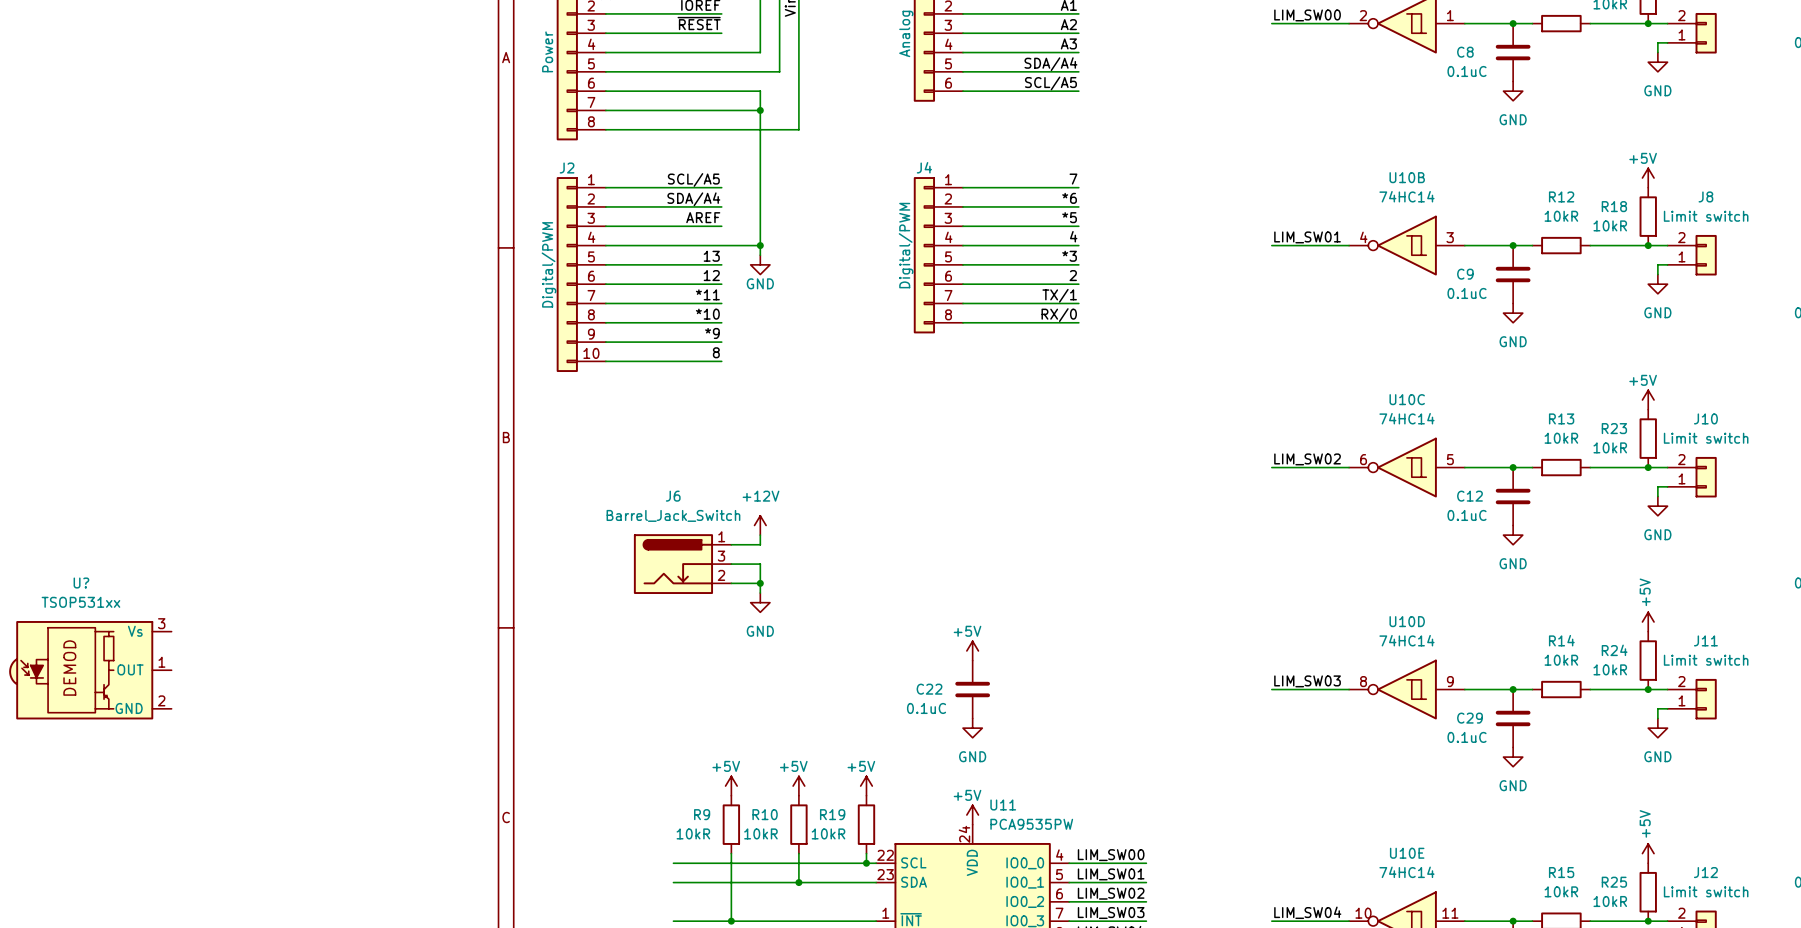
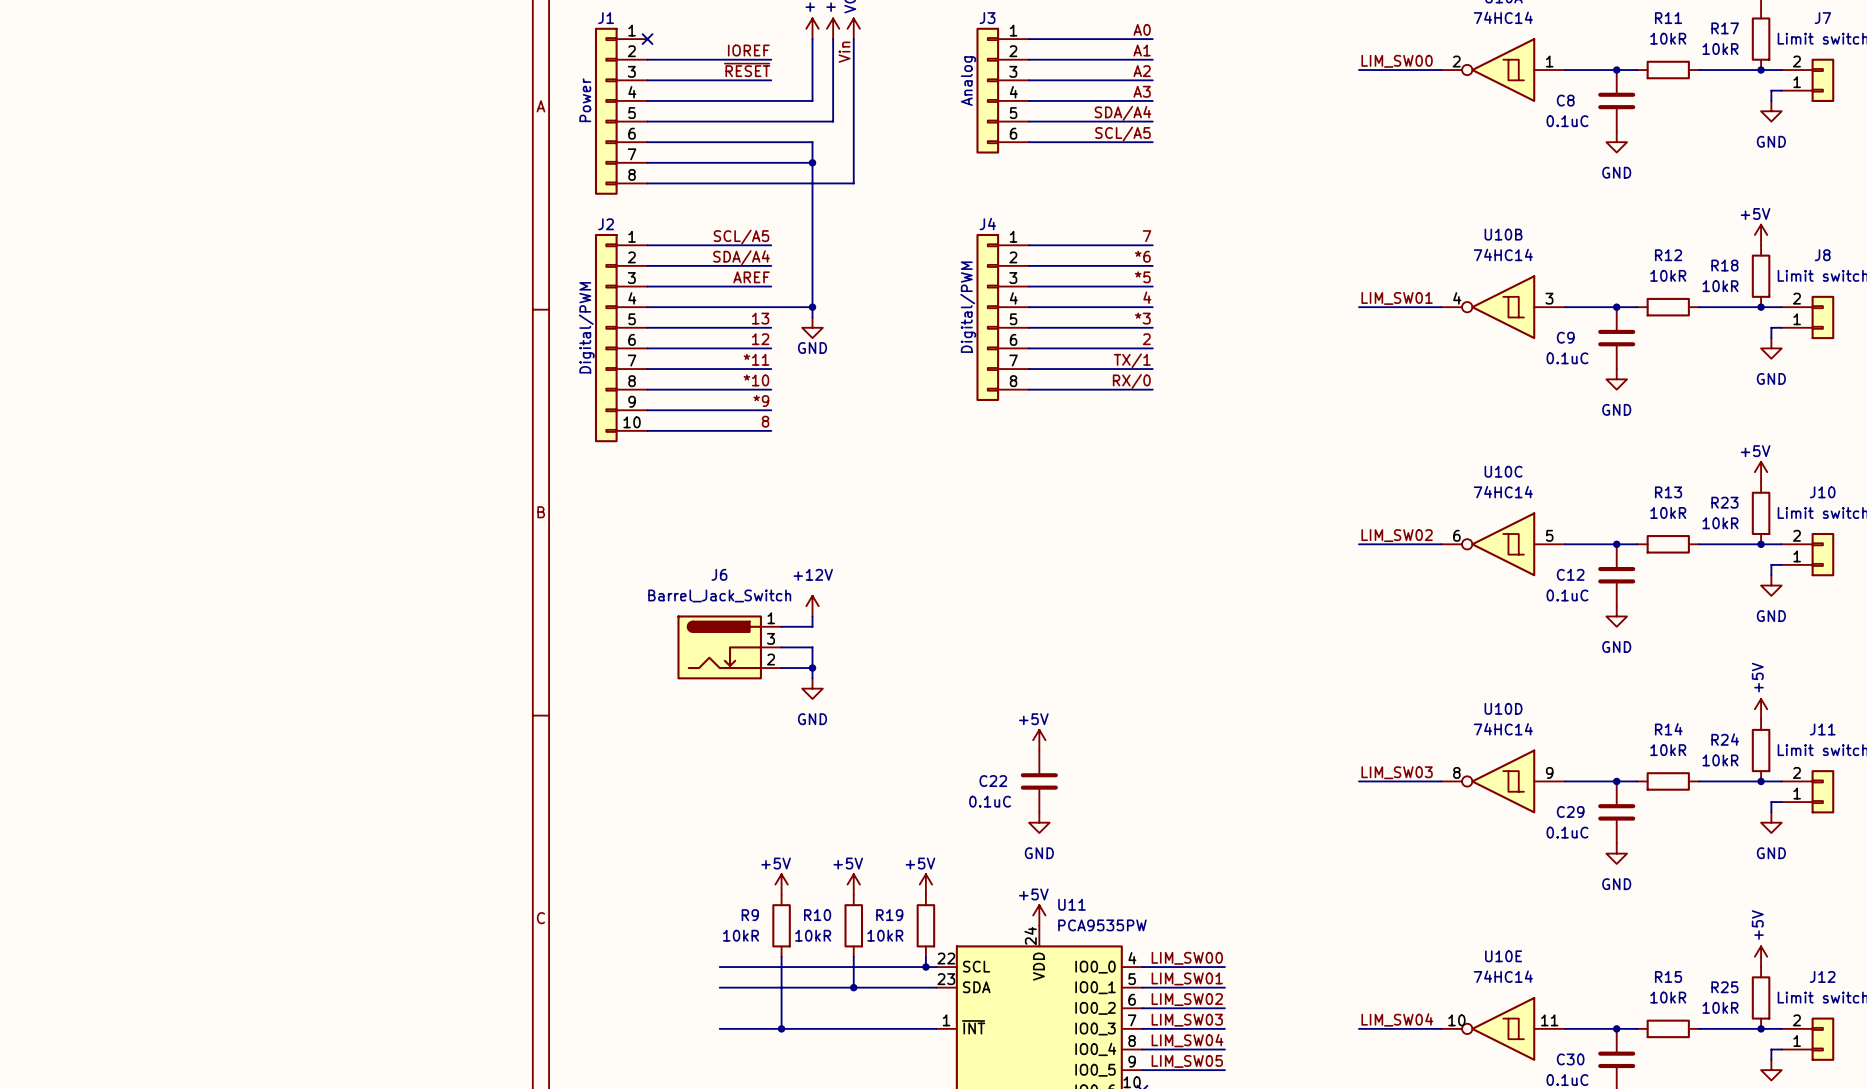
U?: TSOP531xx (90, 670) -> none

